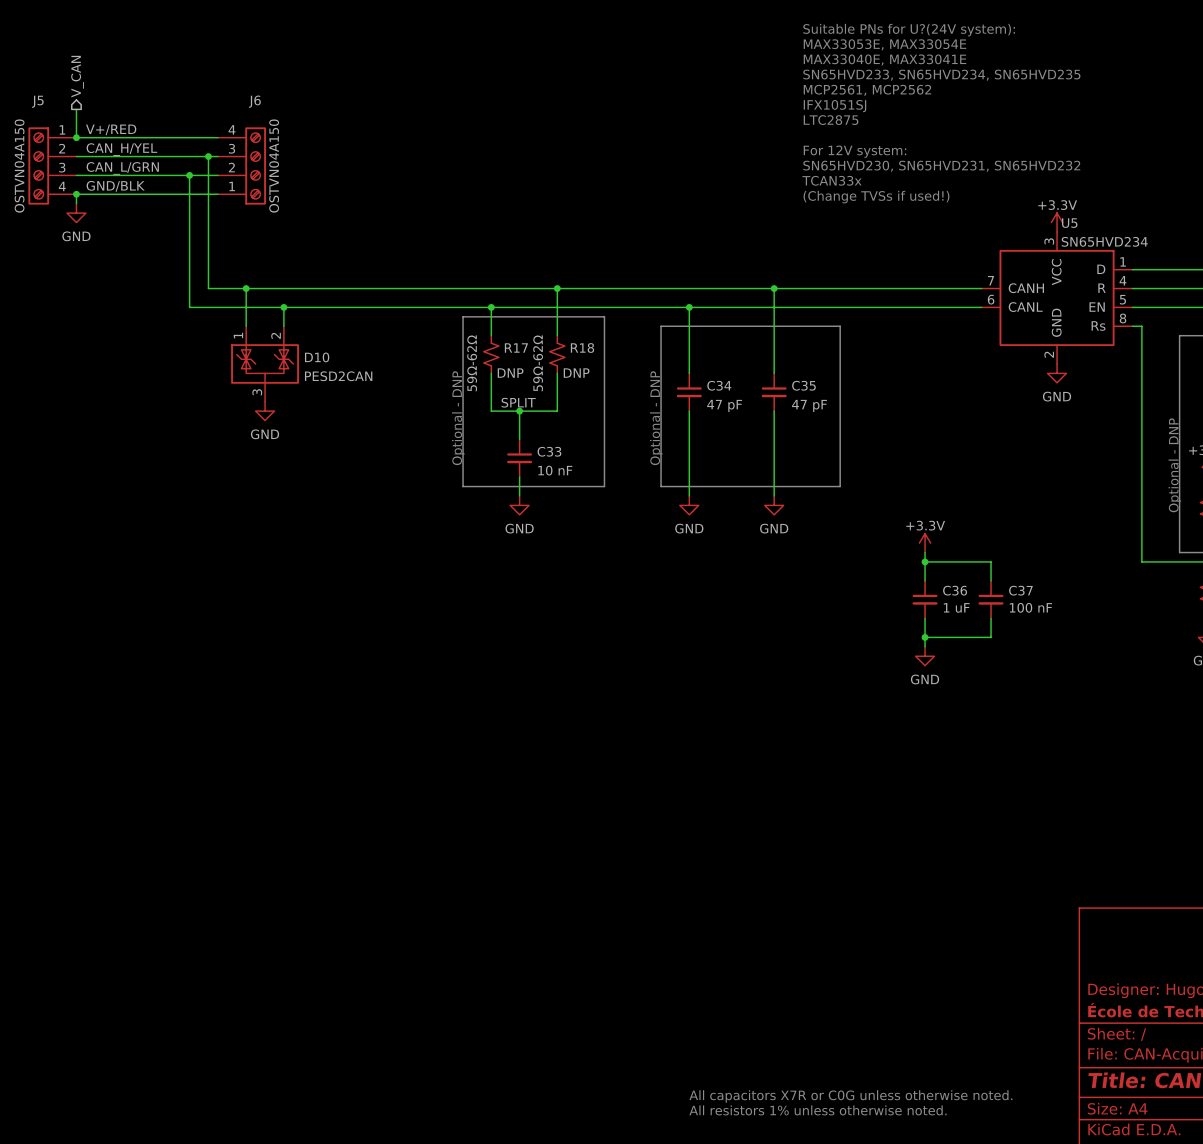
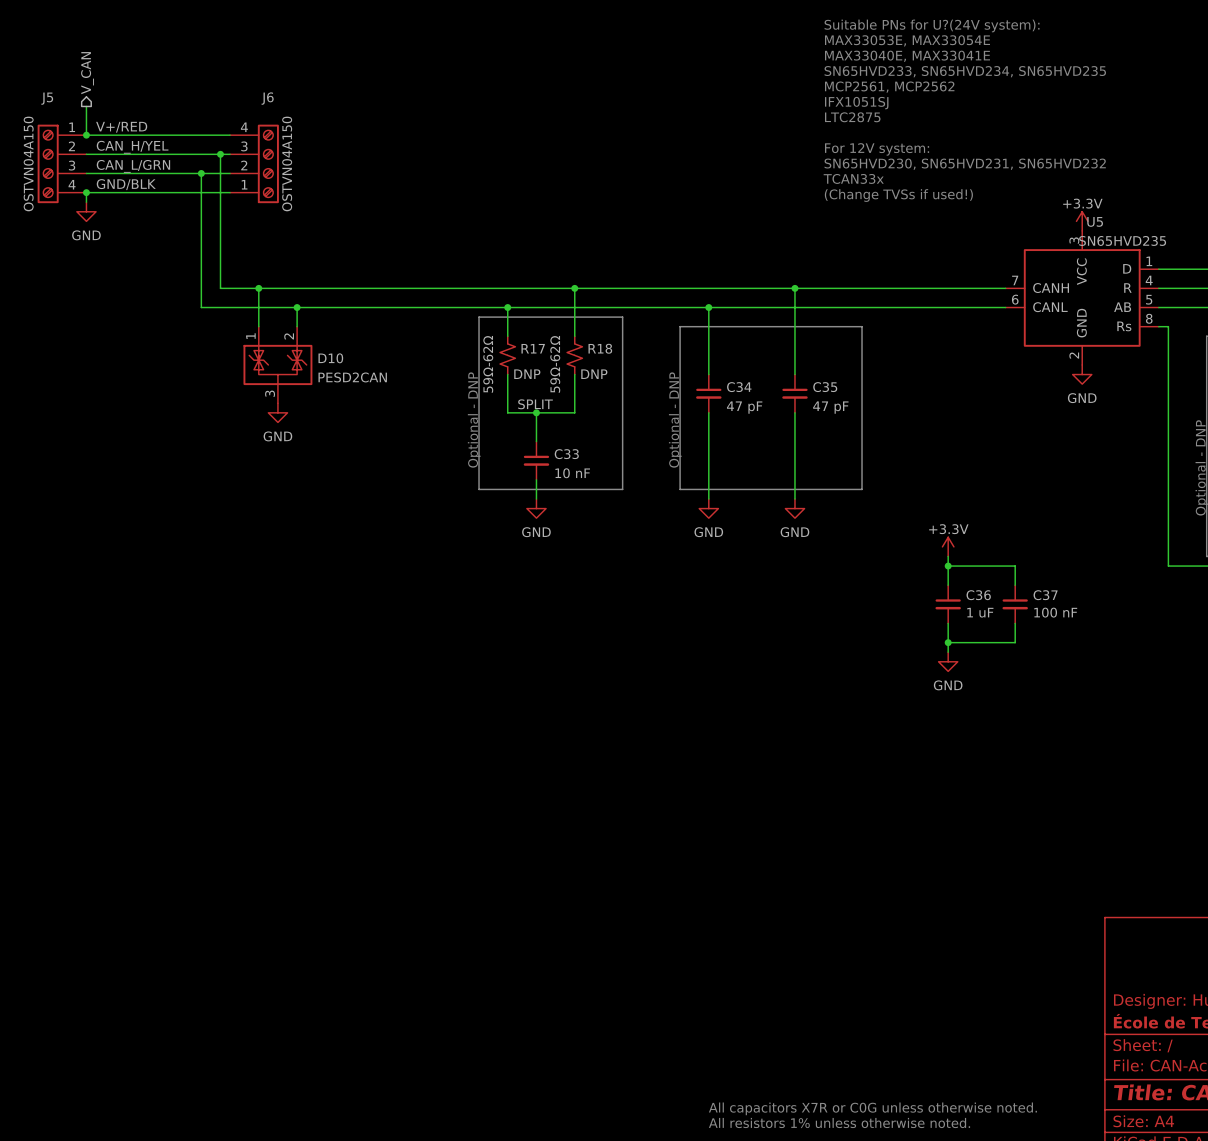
U5 value: SN65HVD234 (1104, 241) -> SN65HVD235 (1122, 240)
U5 pin name: EN (1097, 307) -> AB (1122, 307)

